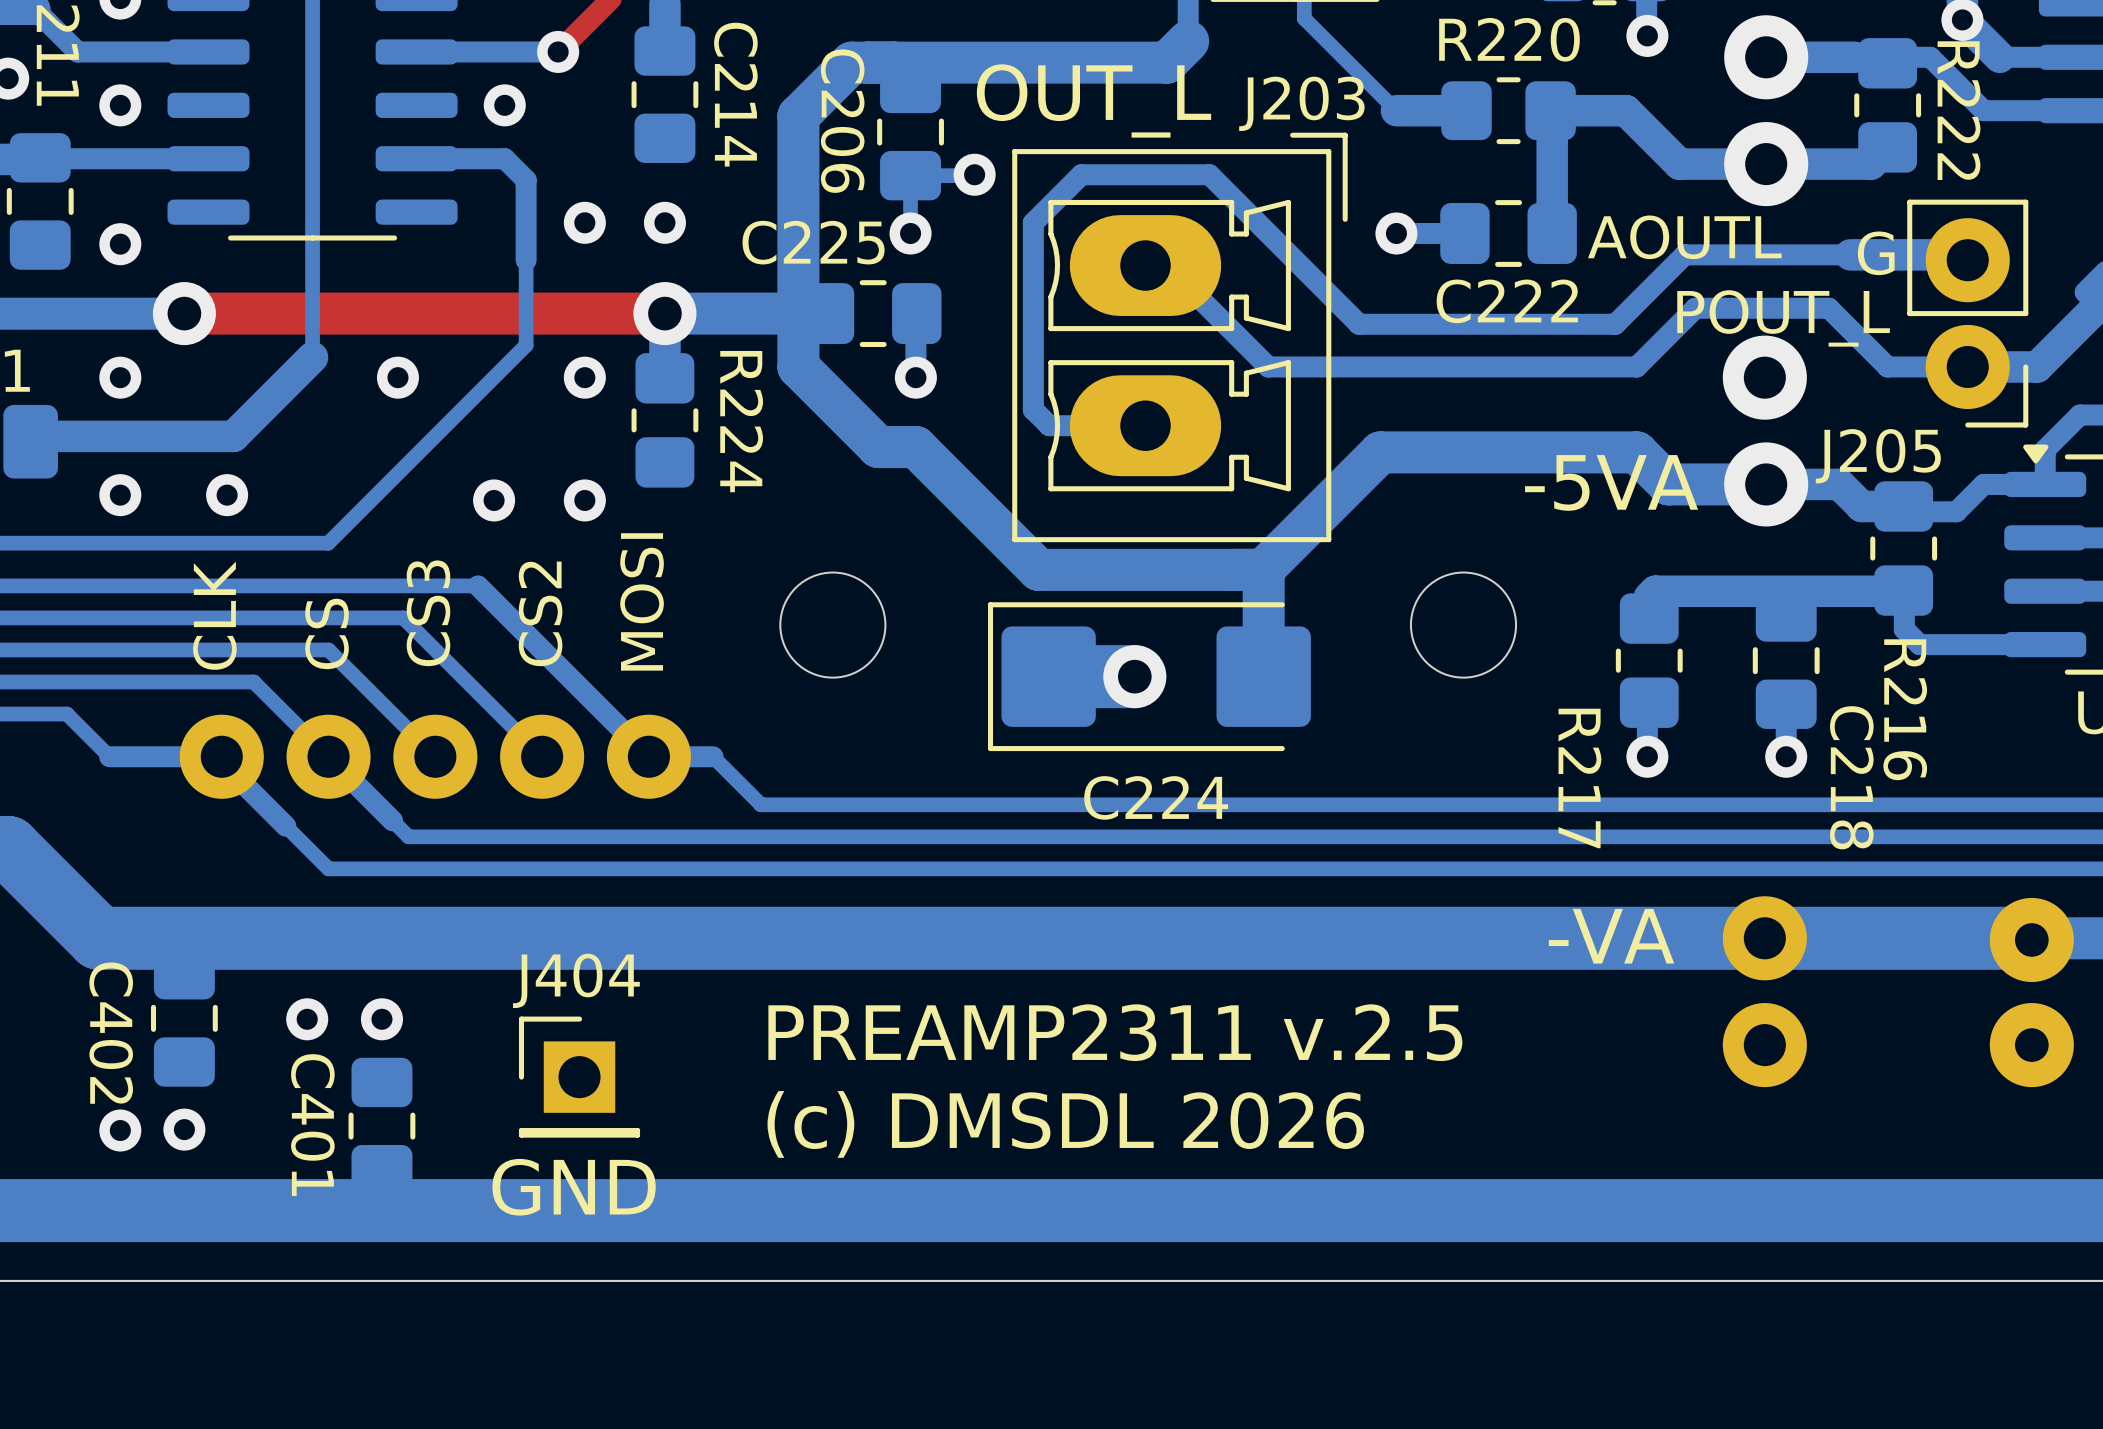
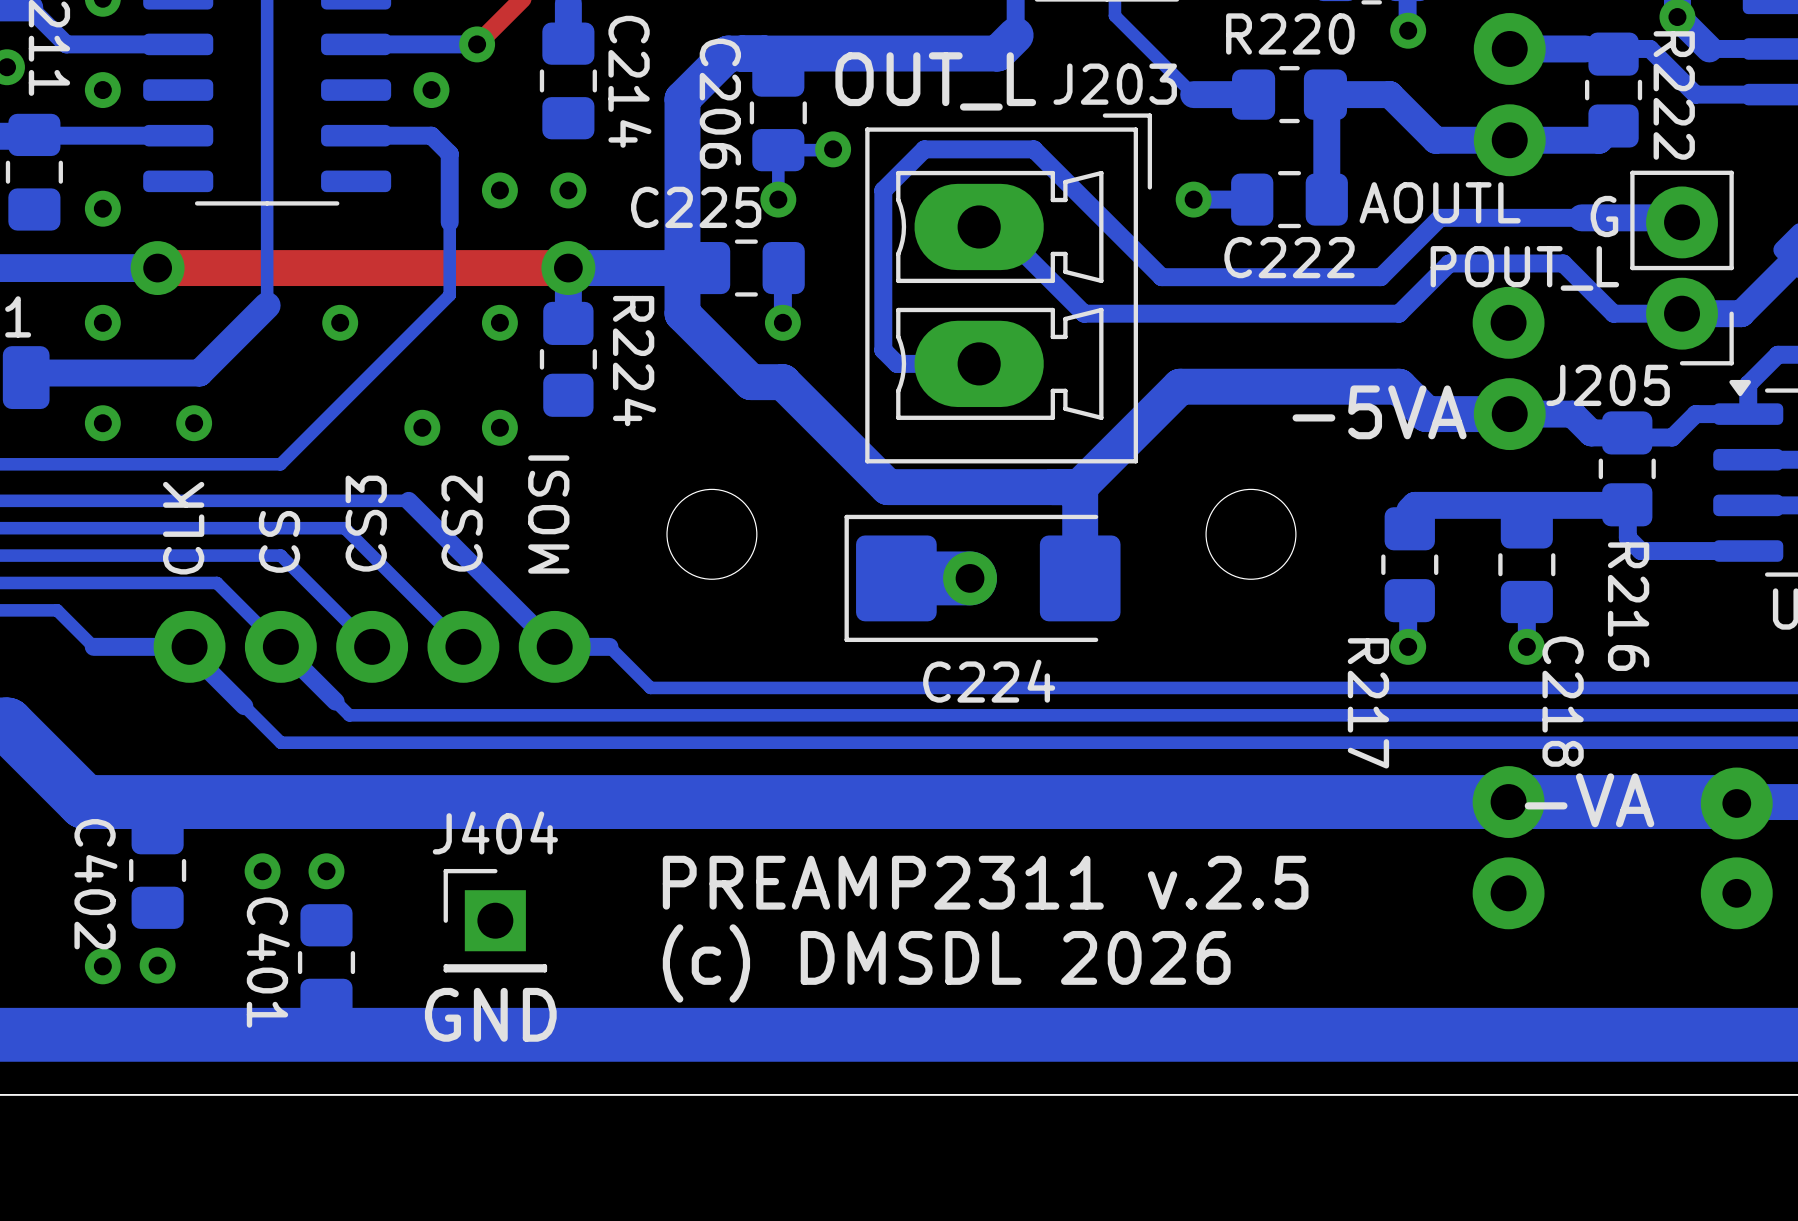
C218 name position: C218 (1851, 777) -> C218 (1563, 701)
R217 name position: R217 (1579, 778) -> R217 (1368, 703)
text position: -VA (1611, 936) -> -VA (1589, 800)

